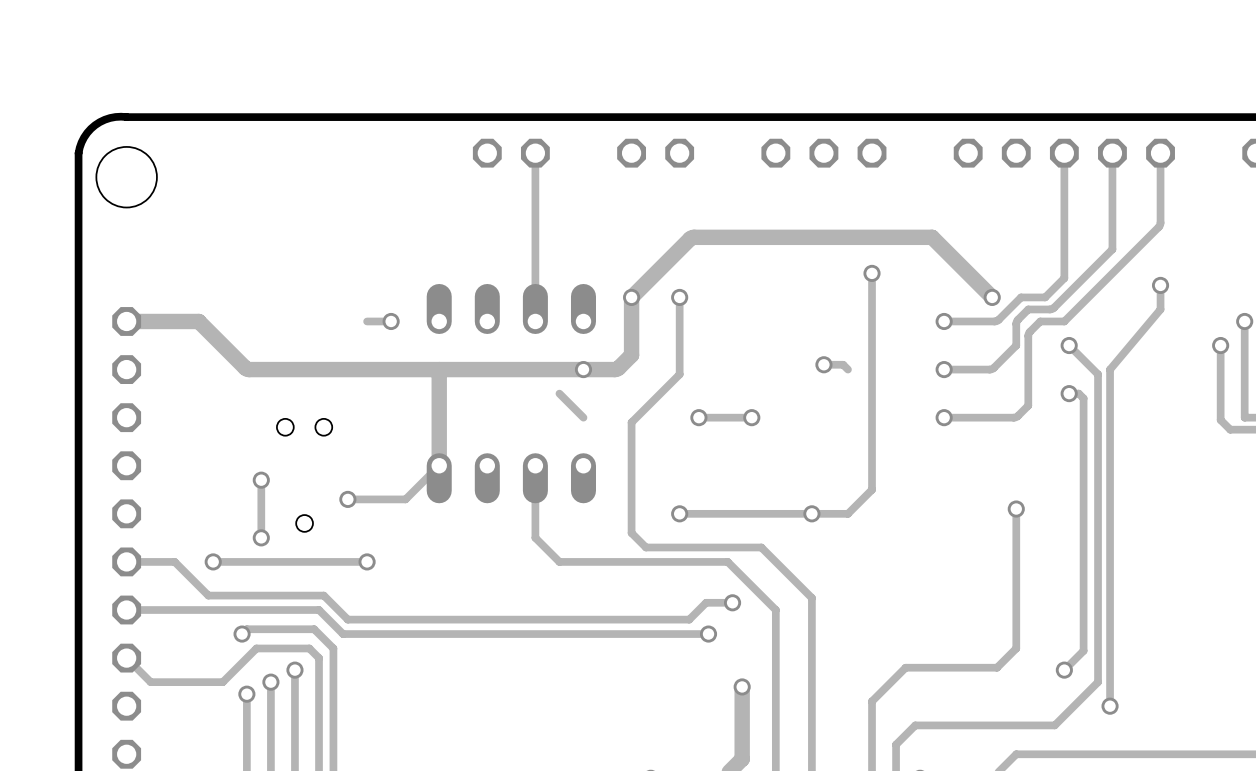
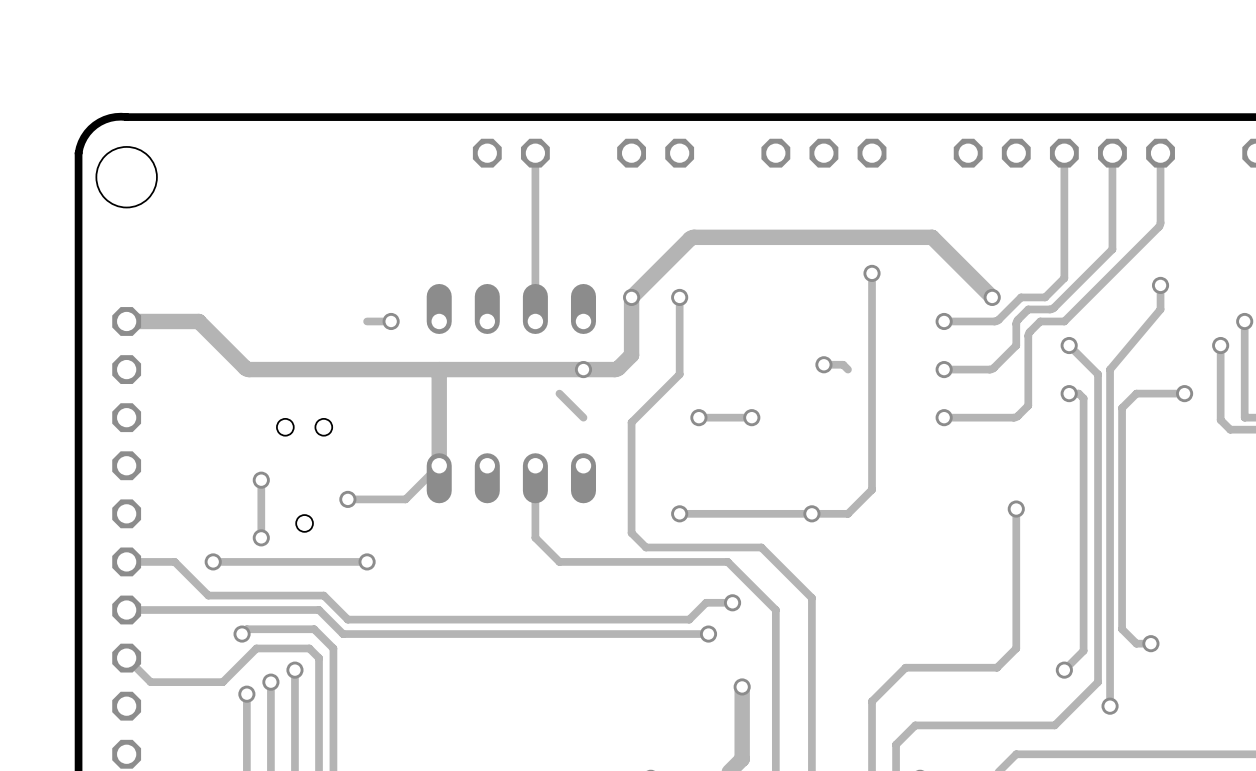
track: none -> (1184, 393) (1136, 393) (1122, 408) (1122, 629) (1136, 643) (1150, 643)
via: none -> (1184, 393)
via: none -> (1150, 643)

